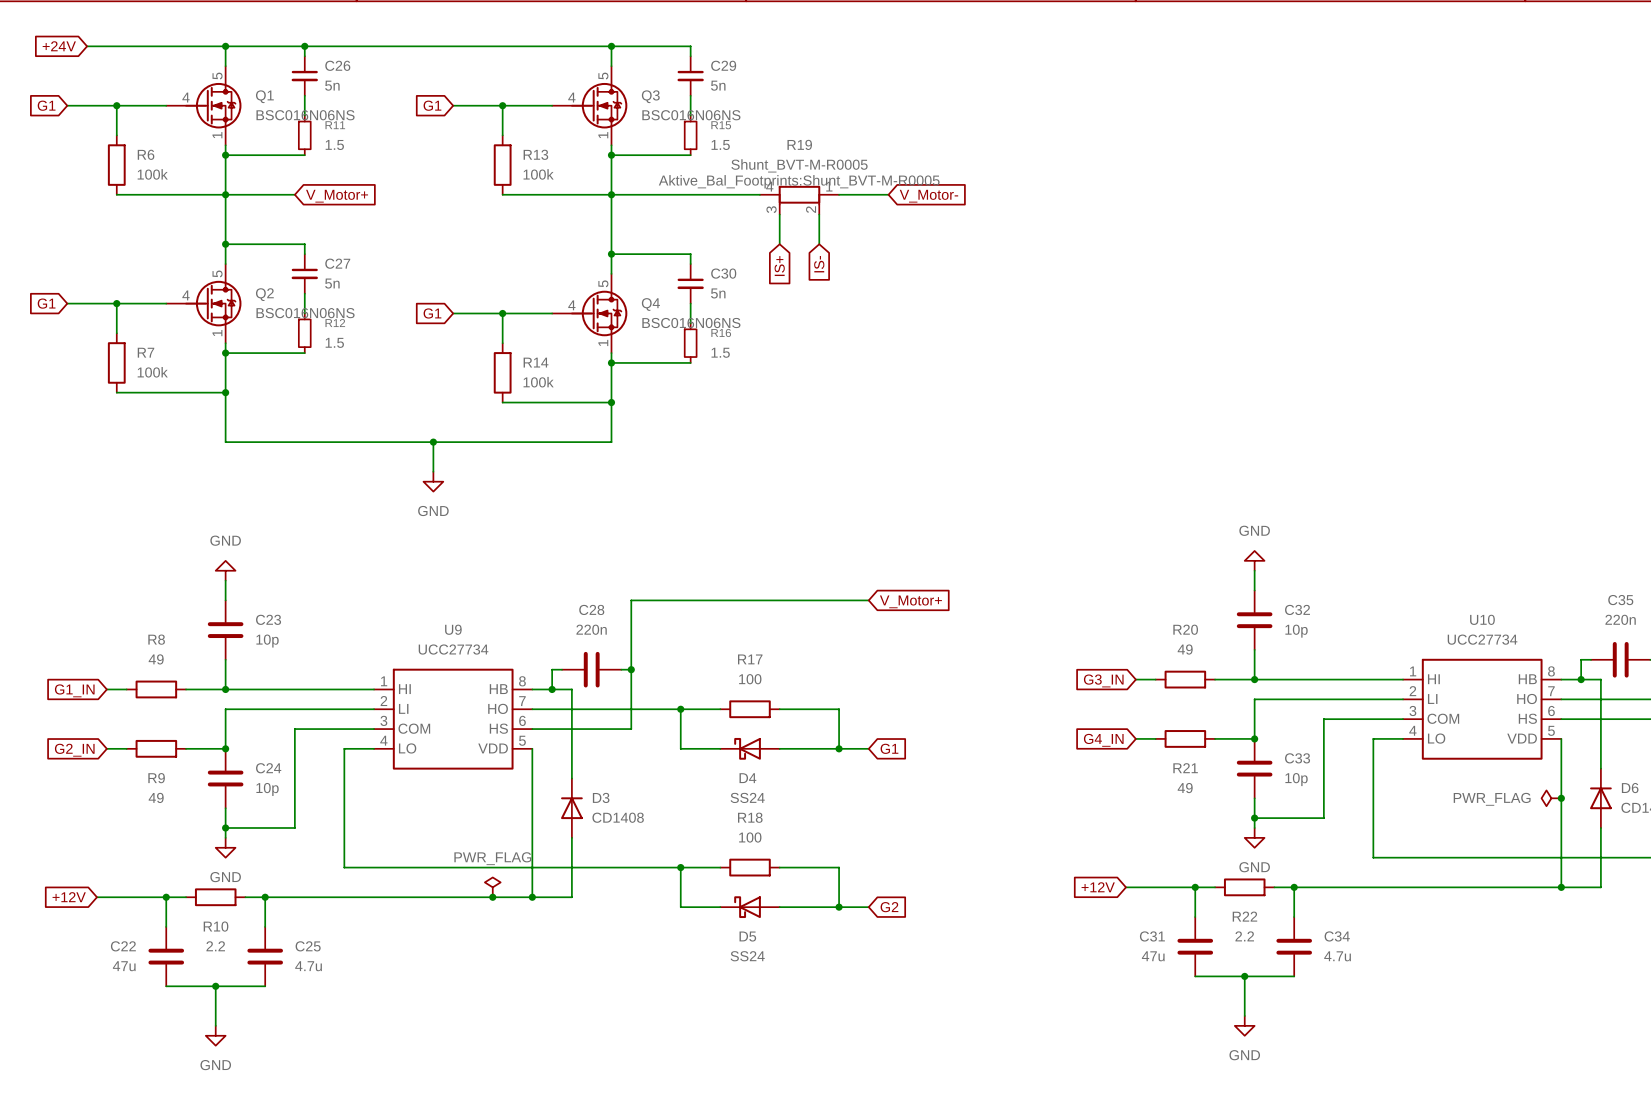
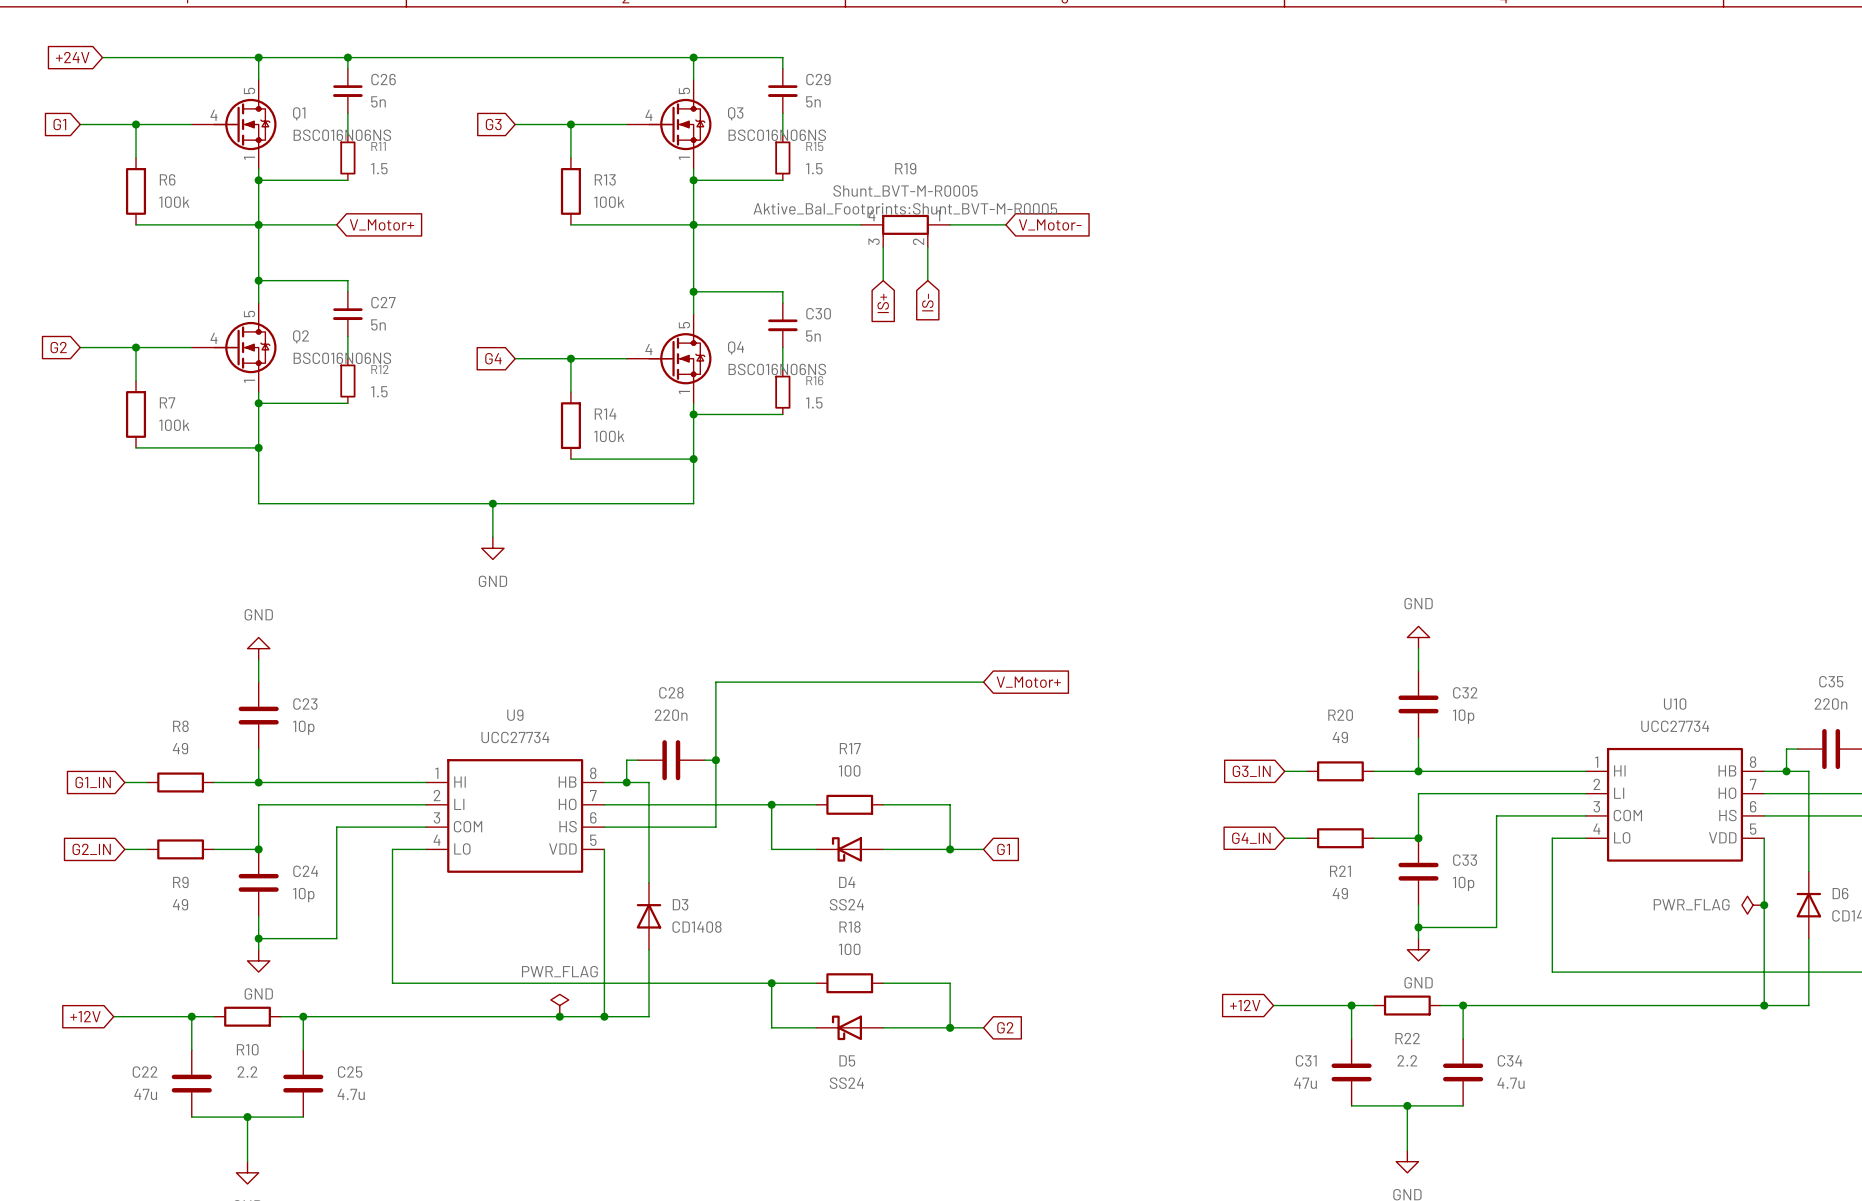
global label: G1 (432, 105) -> G3 (493, 124)
global label: G1 (46, 303) -> G2 (58, 347)
global label: G1 (432, 313) -> G4 (493, 358)

